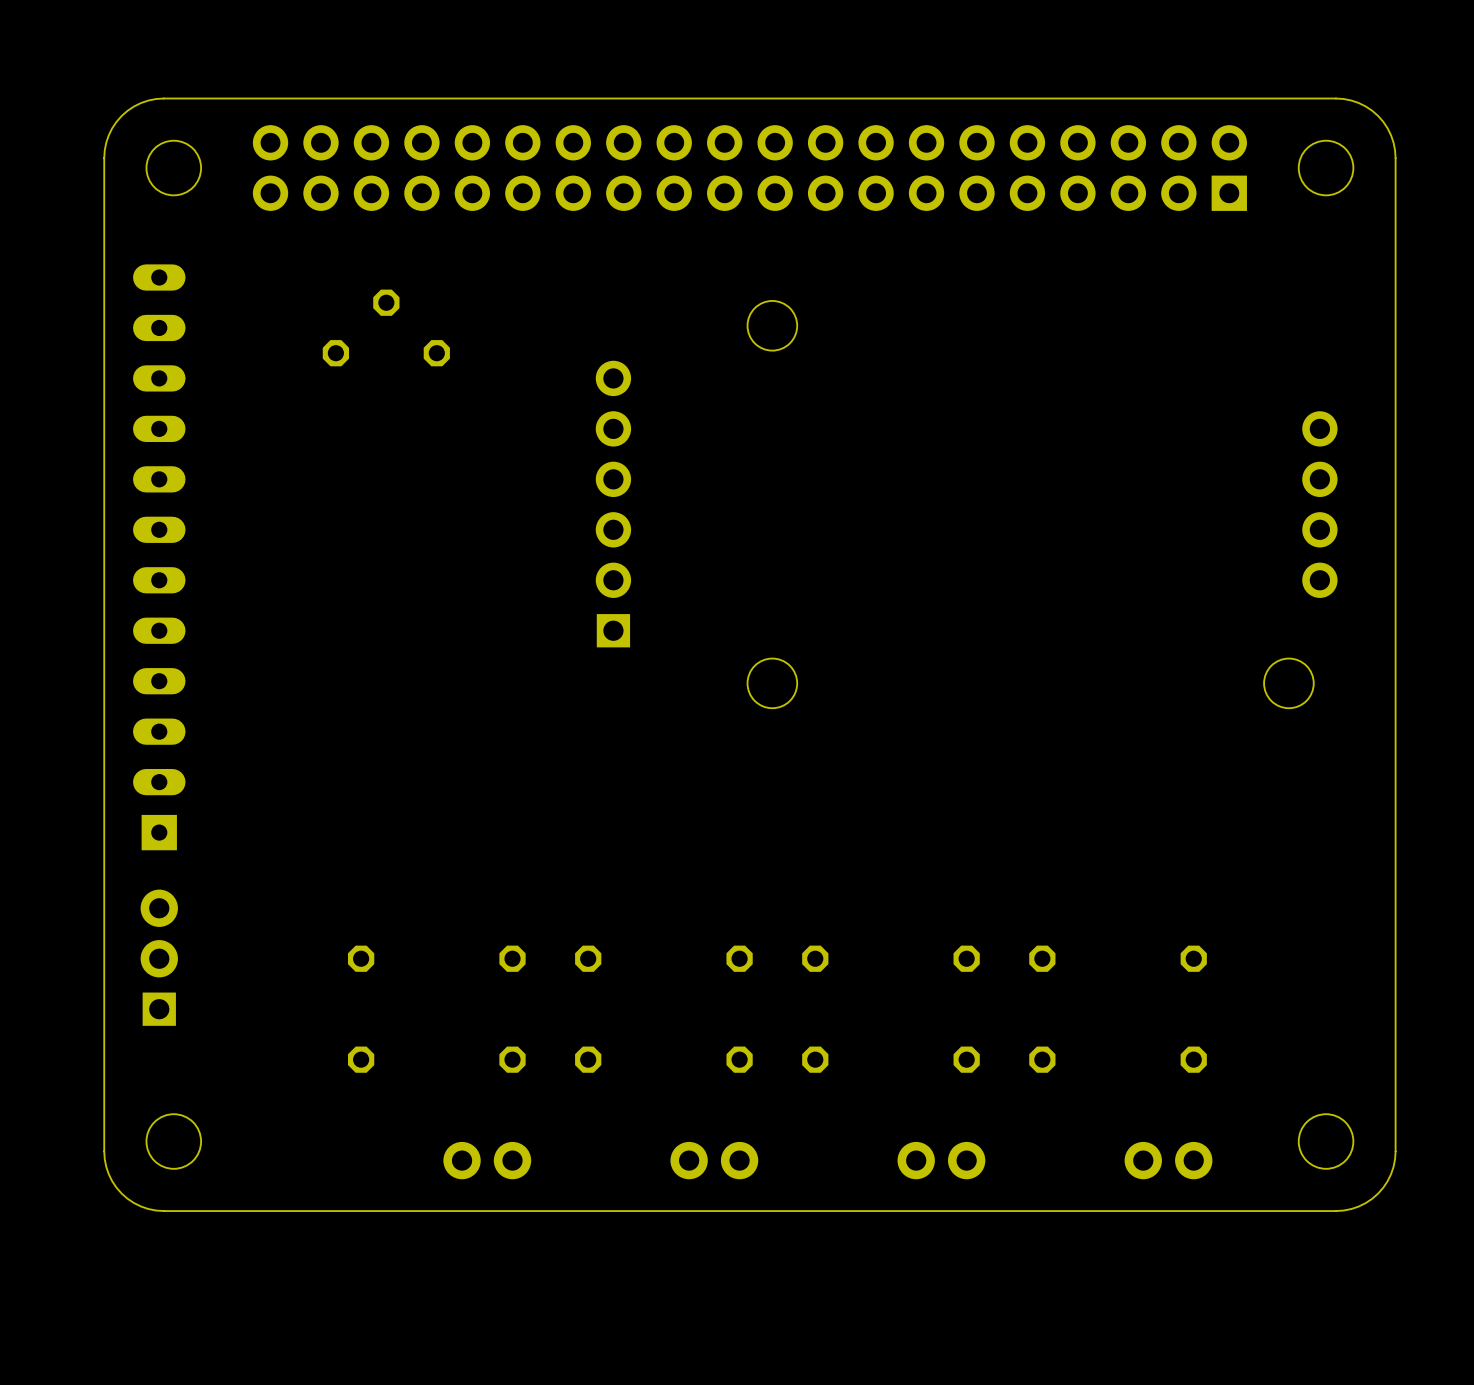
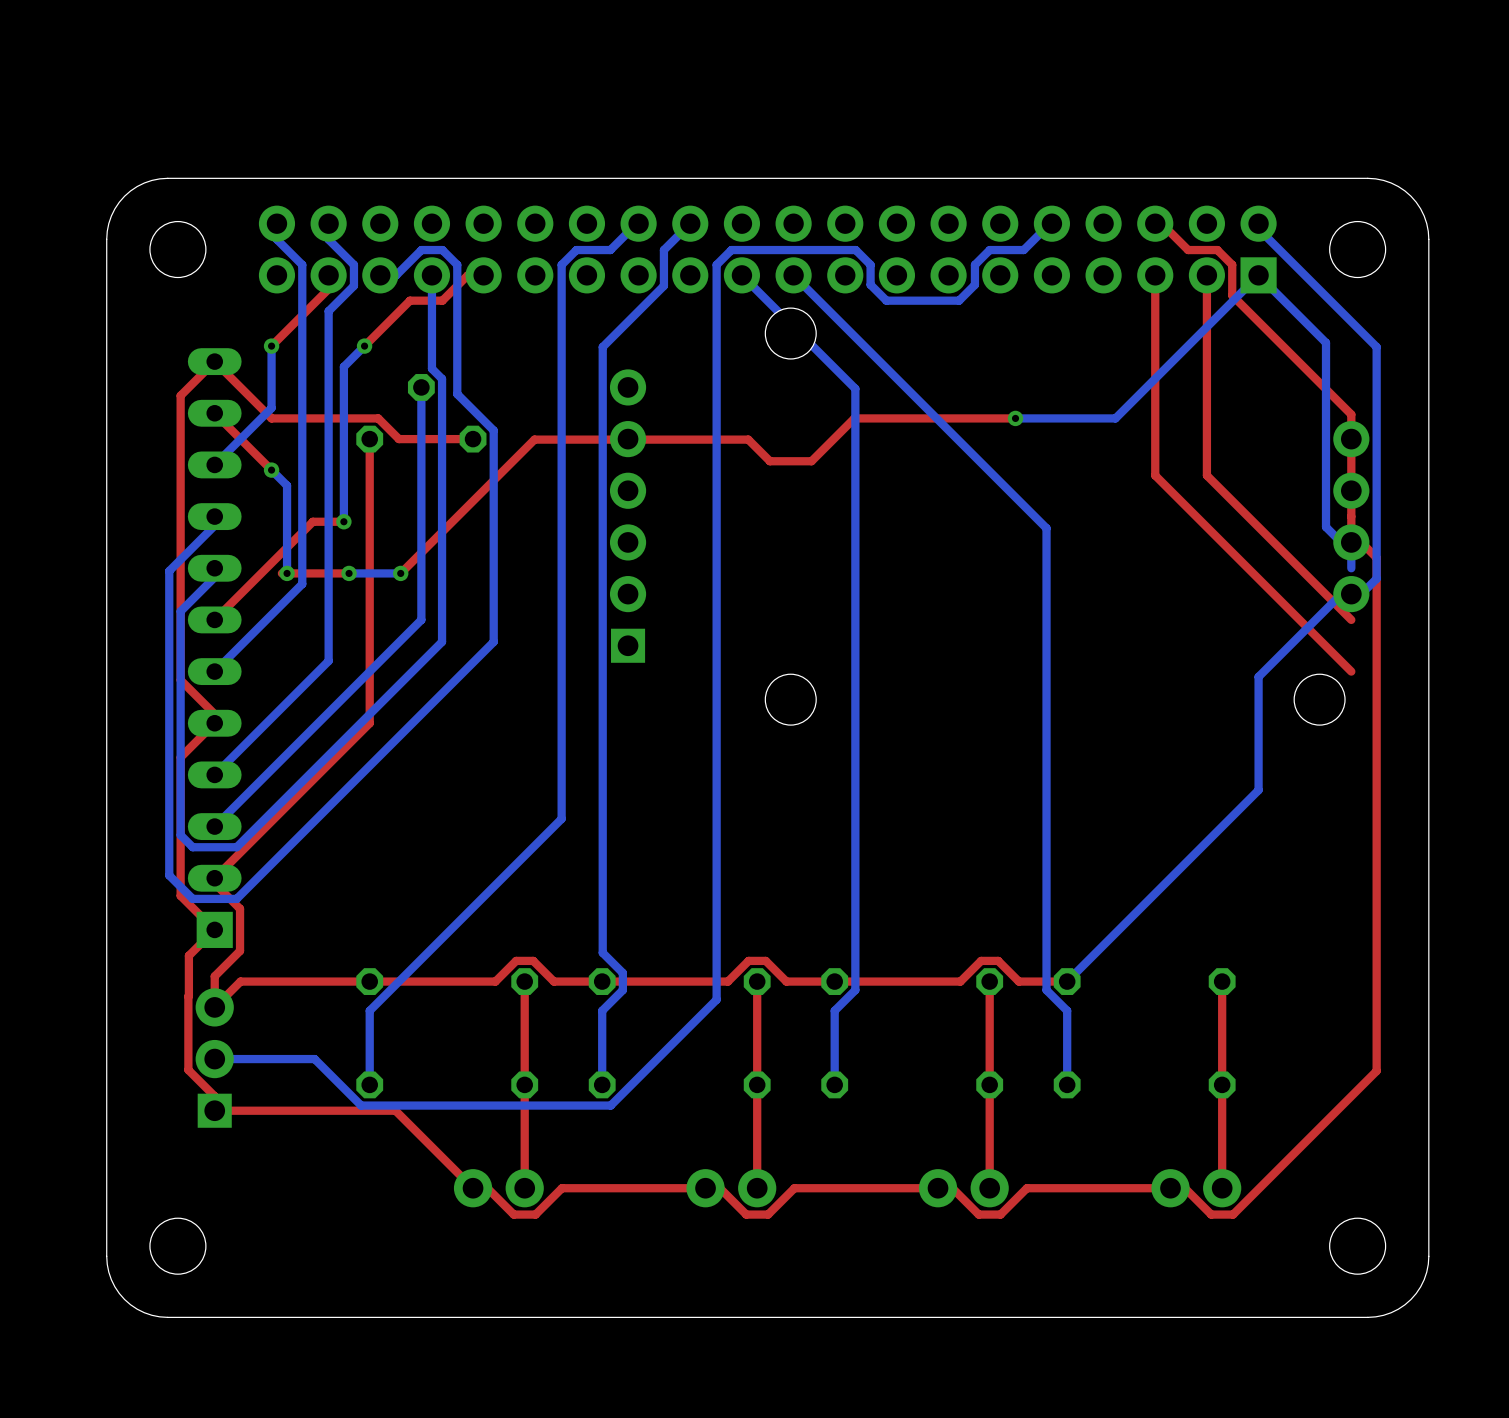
bottom track: none -> (276, 223) (276, 239) (302, 264) (302, 584) (214, 671)
bottom track: none -> (328, 223) (328, 239) (353, 264) (353, 285) (328, 311) (328, 661) (214, 774)
bottom track: none -> (690, 223) (663, 250) (663, 285) (602, 347) (602, 952) (622, 973) (622, 990) (602, 1010) (602, 1084)
bottom track: none -> (1051, 223) (1023, 250) (989, 250) (974, 264) (974, 284) (959, 300) (886, 300) (870, 284) (870, 264) (855, 250) (731, 250) (716, 264) (716, 999) (610, 1105) (361, 1105) (314, 1059) (214, 1059)
bottom track: none -> (1258, 223) (1258, 228) (1376, 347) (1376, 578) (1361, 593) (1341, 593) (1258, 676) (1258, 790) (1067, 981)
bottom track: none -> (628, 232) (610, 250) (576, 250) (561, 264) (561, 818) (369, 1010) (369, 1084)
top track: none -> (1170, 232) (1188, 250) (1217, 250) (1232, 264) (1232, 295) (1351, 414) (1351, 532) (1376, 557) (1376, 1071) (1233, 1214) (1211, 1214) (1184, 1188) (1026, 1188) (1000, 1214) (978, 1214) (952, 1188) (794, 1188) (768, 1214) (746, 1214) (719, 1188) (561, 1188) (535, 1214) (513, 1214) (487, 1188) (473, 1188) (395, 1110) (214, 1110) (214, 1096) (188, 1069) (188, 955) (214, 929) (180, 895) (180, 757) (214, 723) (214, 714) (180, 680) (180, 395) (214, 361) (271, 418) (378, 418) (398, 439) (473, 439)
top track: none -> (328, 275) (328, 289) (271, 346)
bottom track: none -> (380, 275) (396, 275) (421, 250) (442, 250) (457, 264) (457, 394) (493, 430) (493, 641) (236, 898) (192, 898) (169, 875) (169, 571) (214, 525) (214, 516)
bottom track: none -> (431, 275) (431, 368) (442, 378) (442, 641) (236, 847) (192, 847) (180, 835) (180, 611) (214, 577) (214, 568)
top track: none -> (483, 275) (467, 275) (442, 300) (409, 300) (364, 346)
bottom track: none -> (741, 275) (855, 388) (855, 990) (834, 1010) (834, 1084)
bottom track: none -> (793, 275) (1046, 528) (1046, 990) (1067, 1010) (1067, 1084)
top track: none -> (1155, 275) (1155, 475) (1351, 671)
top track: none -> (1206, 275) (1206, 475) (1351, 619)
part position: (386, 327) -> (421, 413)
bottom track: none -> (271, 346) (271, 408) (214, 464)
via: none -> (271, 346)
bottom track: none -> (364, 346) (343, 366) (343, 521)
via: none -> (364, 346)
bottom track: none -> (421, 387) (421, 619) (214, 826)
top track: none -> (214, 413) (271, 470)
top track: none -> (1015, 418) (854, 418) (811, 461) (769, 461) (748, 439) (534, 439) (400, 573)
bottom track: none -> (1015, 418) (1115, 418) (1258, 275) (1326, 342) (1326, 527) (1351, 552) (1351, 568)
via: none -> (1015, 418)
top track: none -> (369, 439) (369, 723) (214, 878) (214, 883) (240, 908) (240, 950) (214, 976) (214, 1007) (240, 981) (495, 981) (516, 960) (533, 960) (553, 981) (727, 981) (748, 960) (765, 960) (786, 981) (960, 981) (981, 960) (998, 960) (1018, 981) (1067, 981)
bottom track: none -> (271, 470) (287, 485) (287, 573)
via: none -> (271, 470)
top track: none -> (343, 521) (312, 521) (214, 619)
via: none -> (343, 521)
part position: (159, 557) -> (214, 648)
via: none -> (287, 573)
top track: none -> (349, 573) (281, 573)
via: none -> (349, 573)
bottom track: none -> (400, 573) (349, 573)
via: none -> (400, 573)
part position: (749, 654) -> (767, 747)
part position: (159, 957) -> (214, 1058)
top track: none -> (524, 981) (524, 1188)
top track: none -> (757, 981) (757, 1188)
top track: none -> (989, 981) (989, 1188)
top track: none -> (1222, 981) (1222, 1188)

